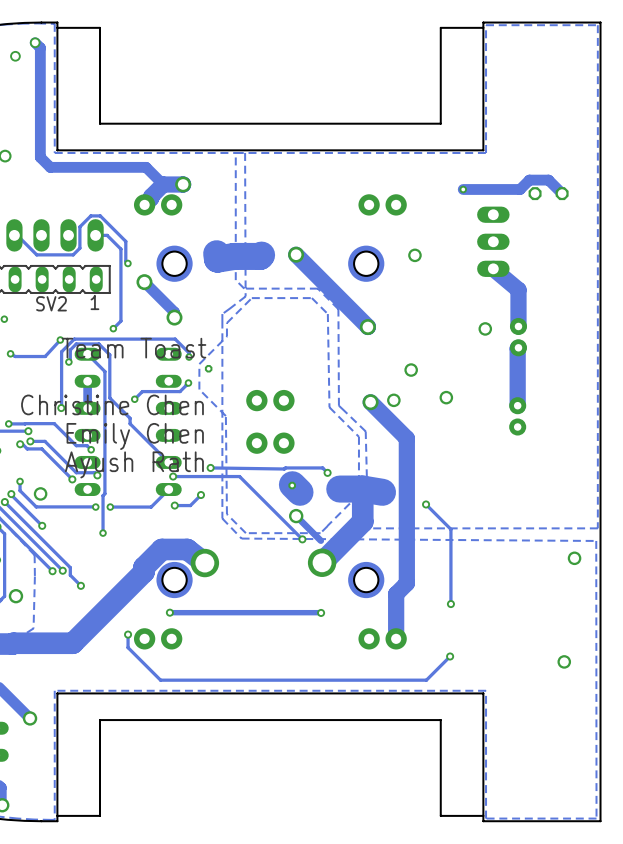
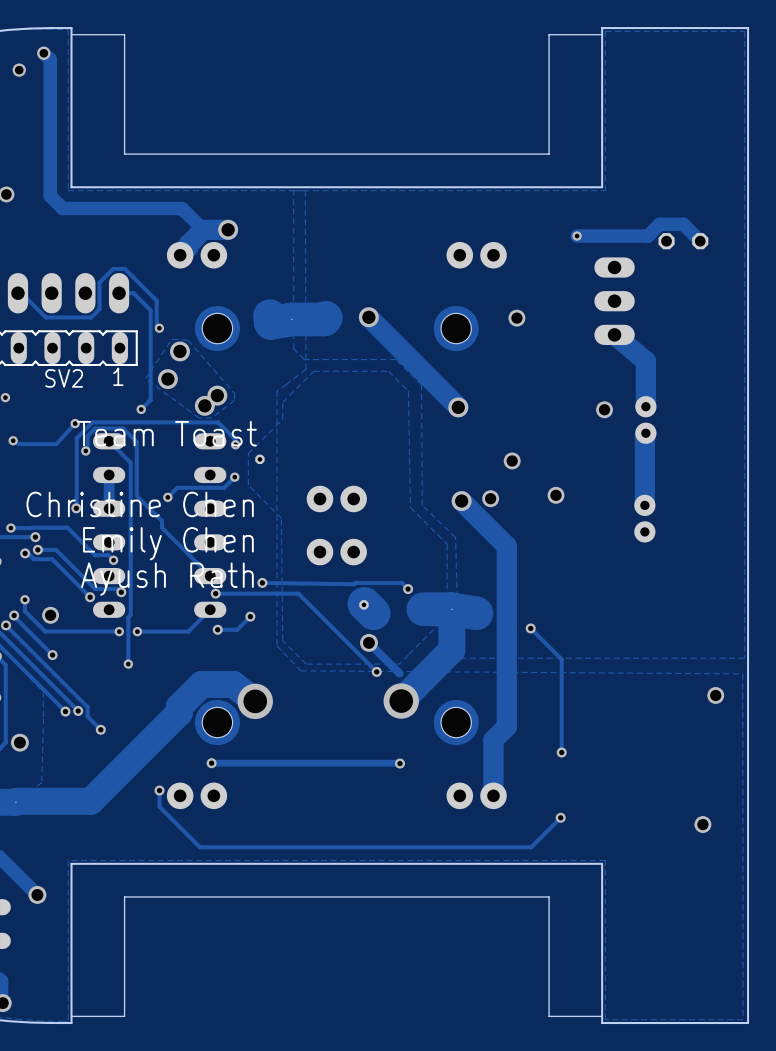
zone outline: none -> (172, 339) (145, 378) (199, 418) (211, 417) (234, 400) (234, 393) (188, 340) (172, 339)
track: (144, 282) (174, 312) (174, 317) -> none
via: none -> (167, 379)
via: none -> (204, 405)

